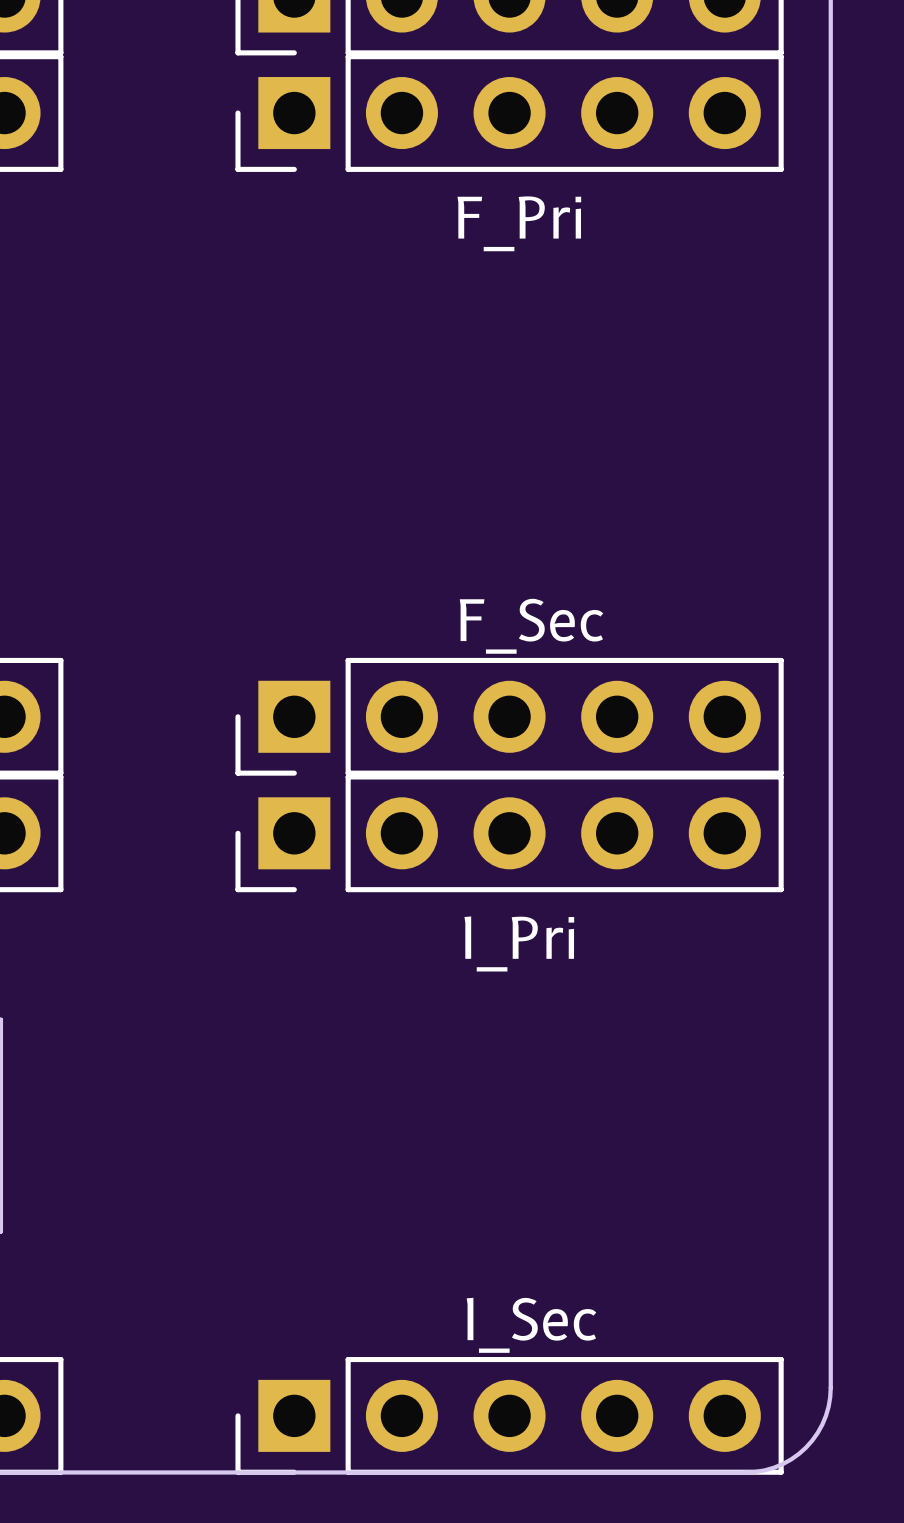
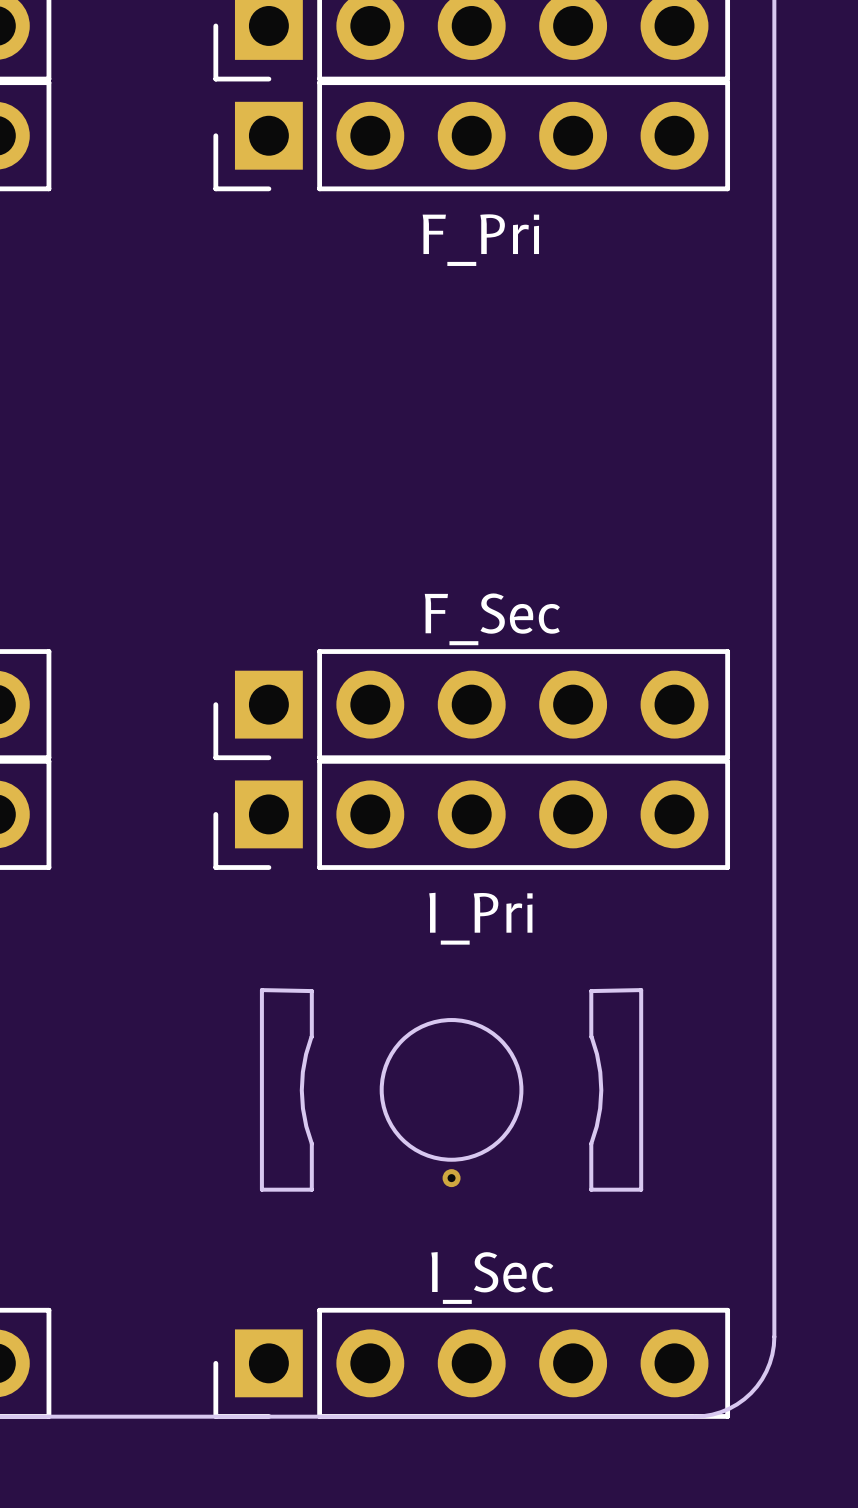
round board edge: none -> [379, 1018, 524, 1162]
board edge: none -> (311, 1036) (306, 1054) (301, 1090) (306, 1126) (311, 1143) (311, 1189) (261, 1189) (261, 990) (311, 991) (311, 1036)
board edge: none -> (591, 1036) (600, 1072) (601, 1090) (596, 1126) (591, 1143) (591, 1189) (641, 1189) (641, 990) (591, 991) (591, 1036)
via: none -> (451, 1178)

